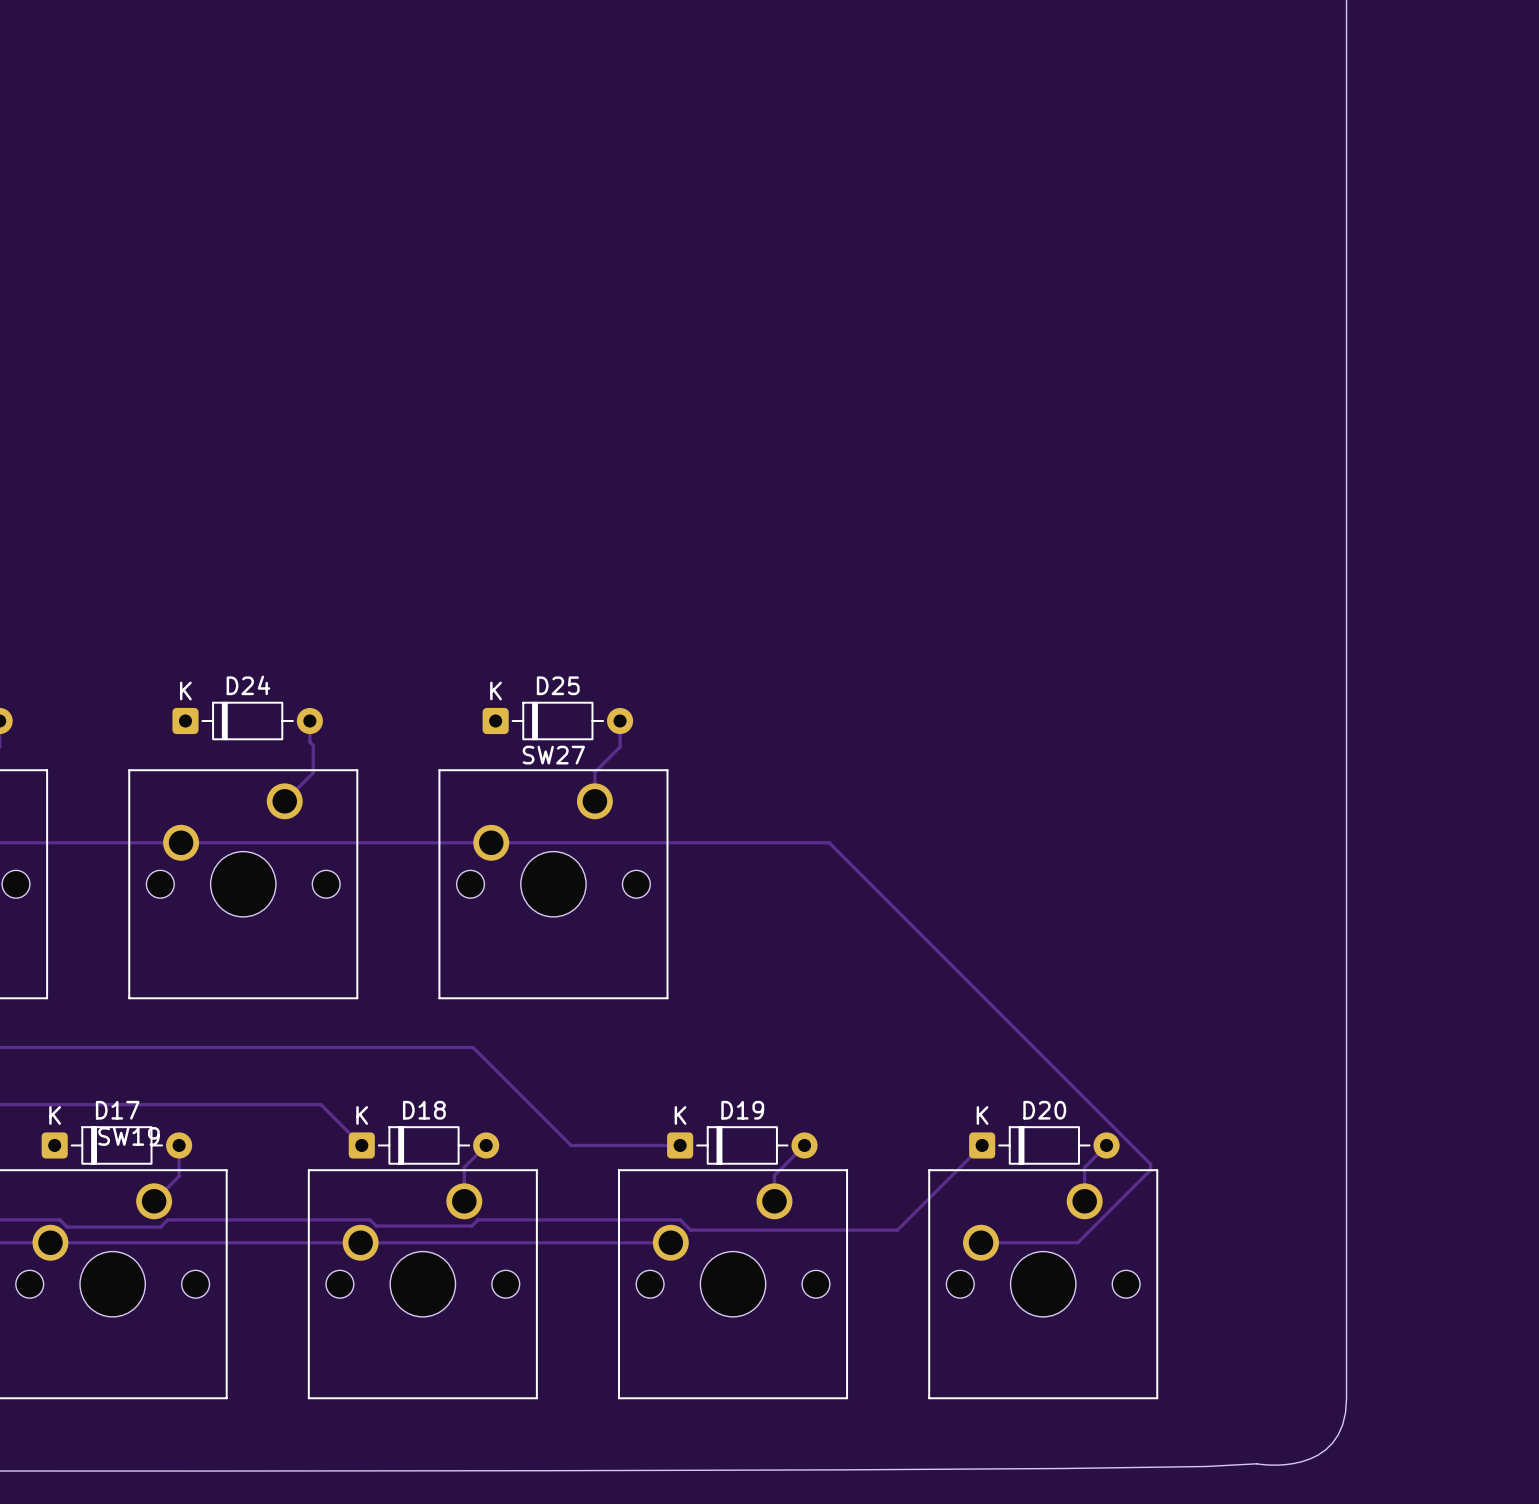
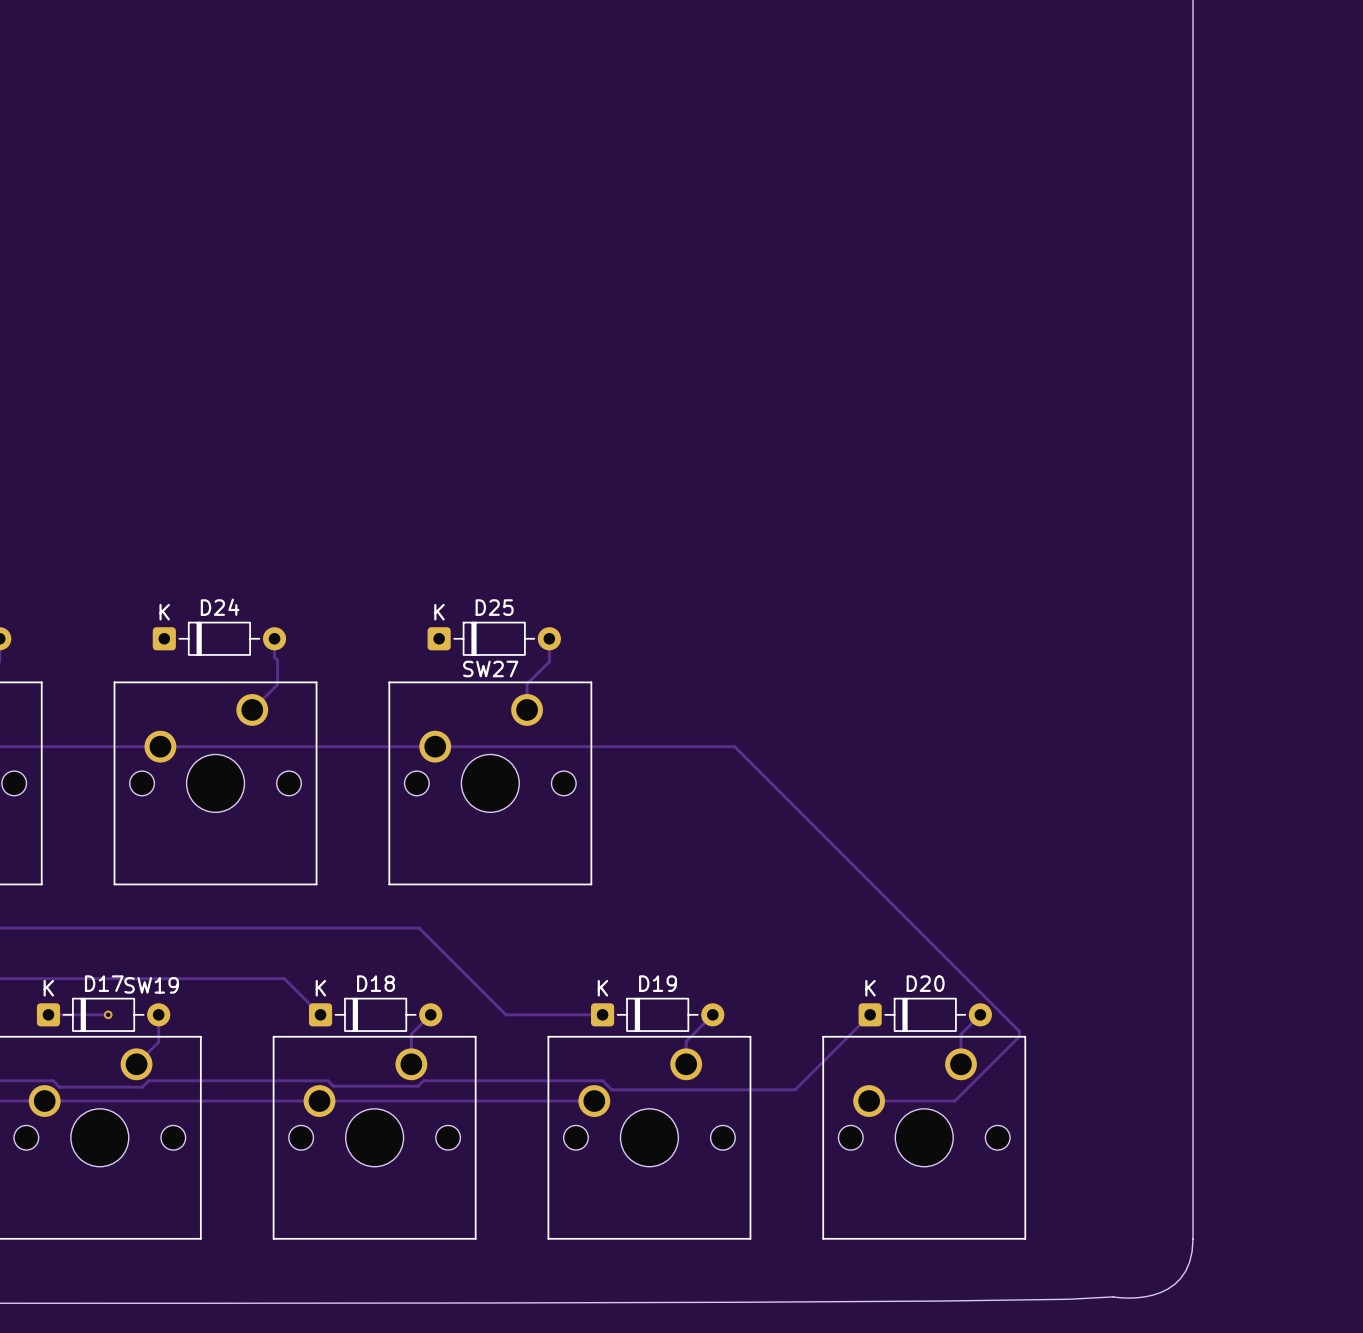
SW19 name position: SW19 (128, 1136) -> SW19 (151, 985)
track: none -> (48, 1014) (108, 1014)
via: none -> (108, 1014)

